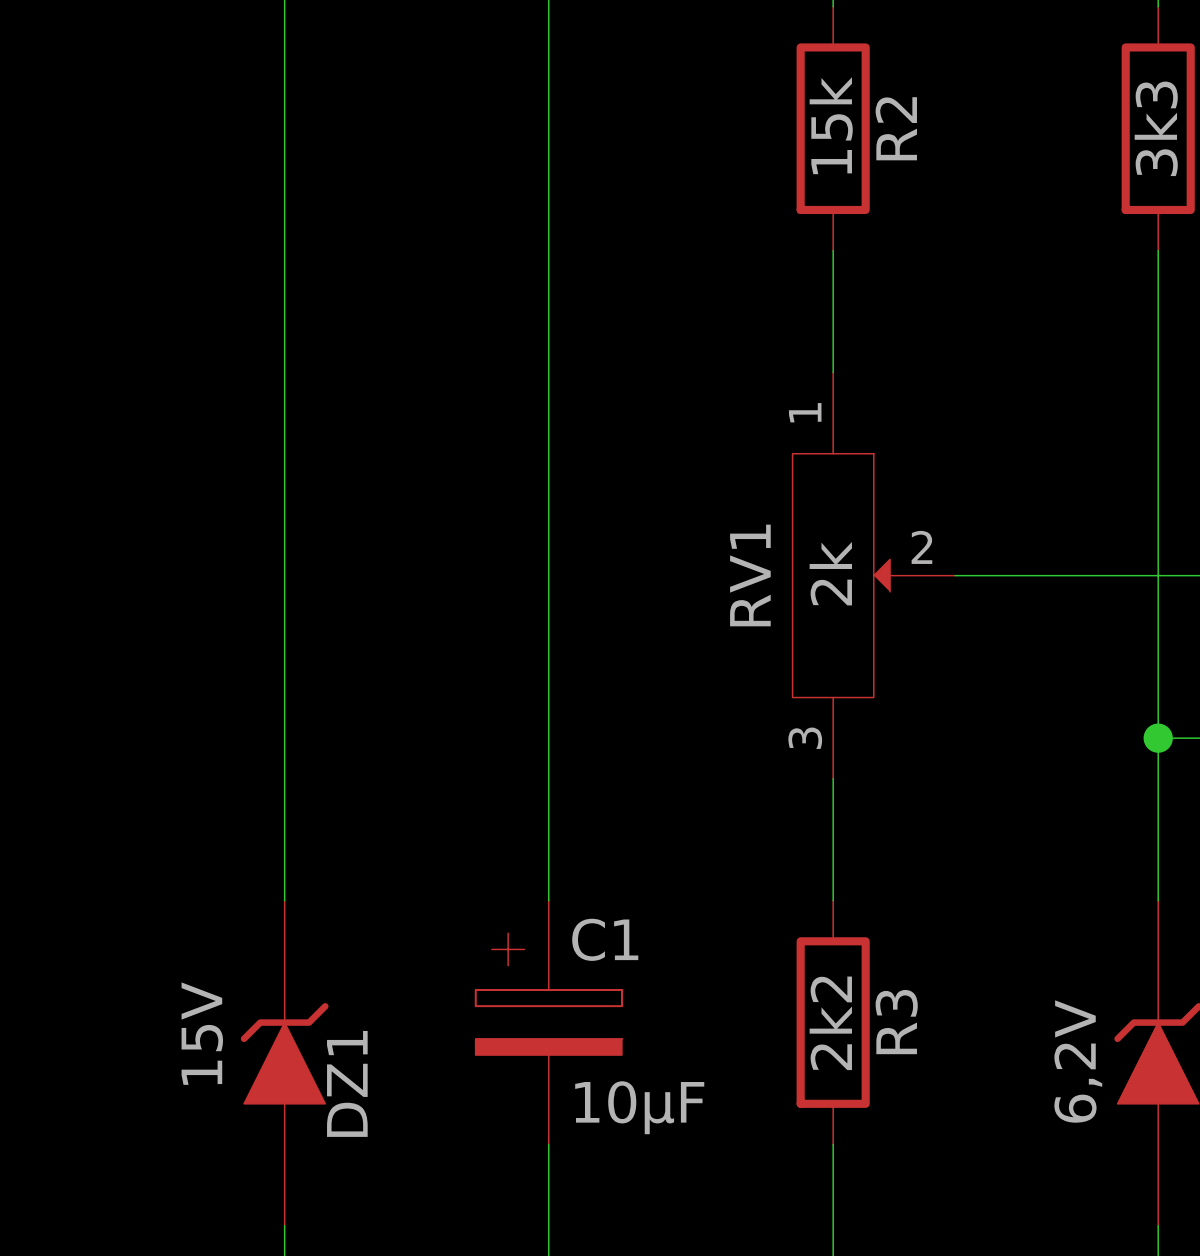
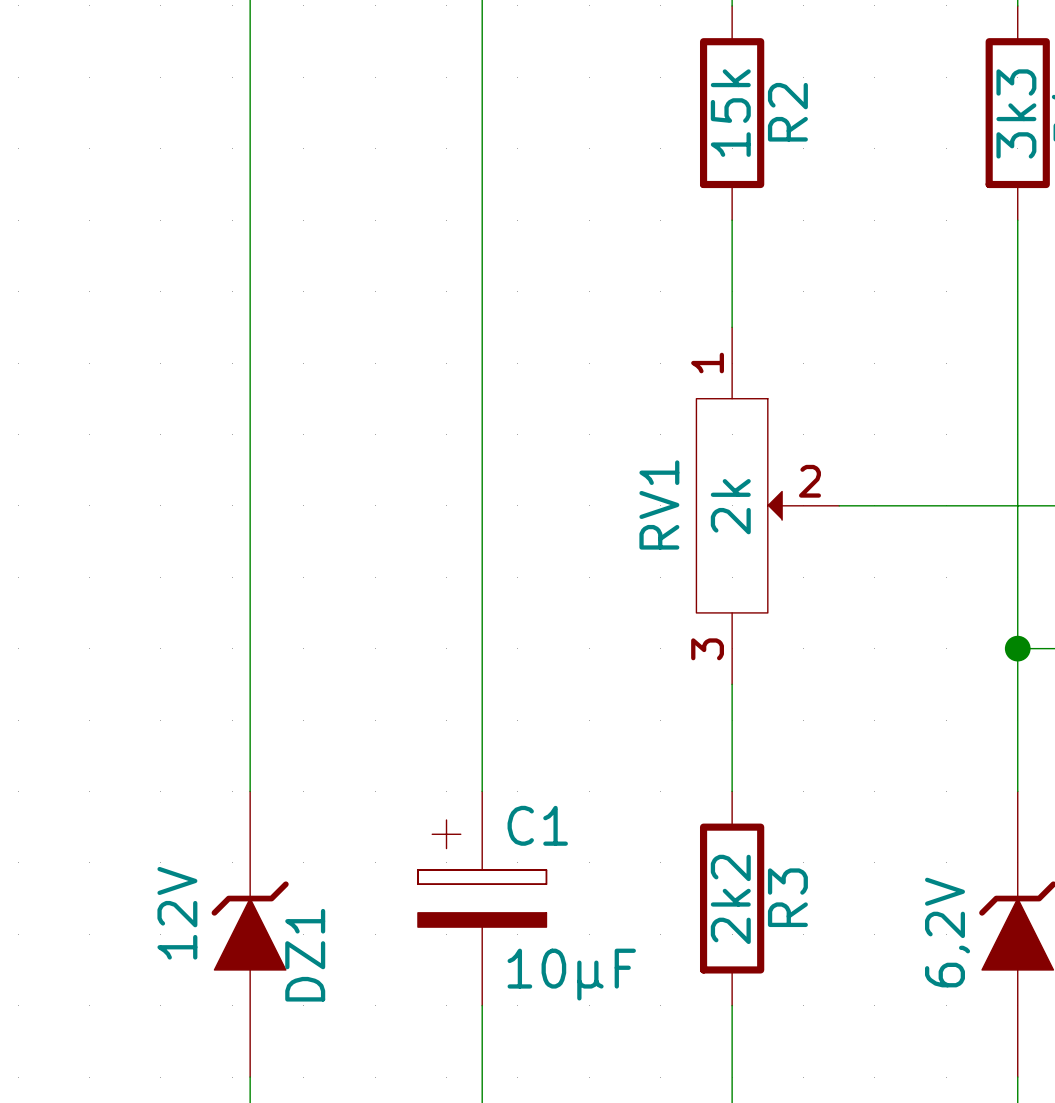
DZ1 value: 15V (202, 1033) -> 12V (177, 913)

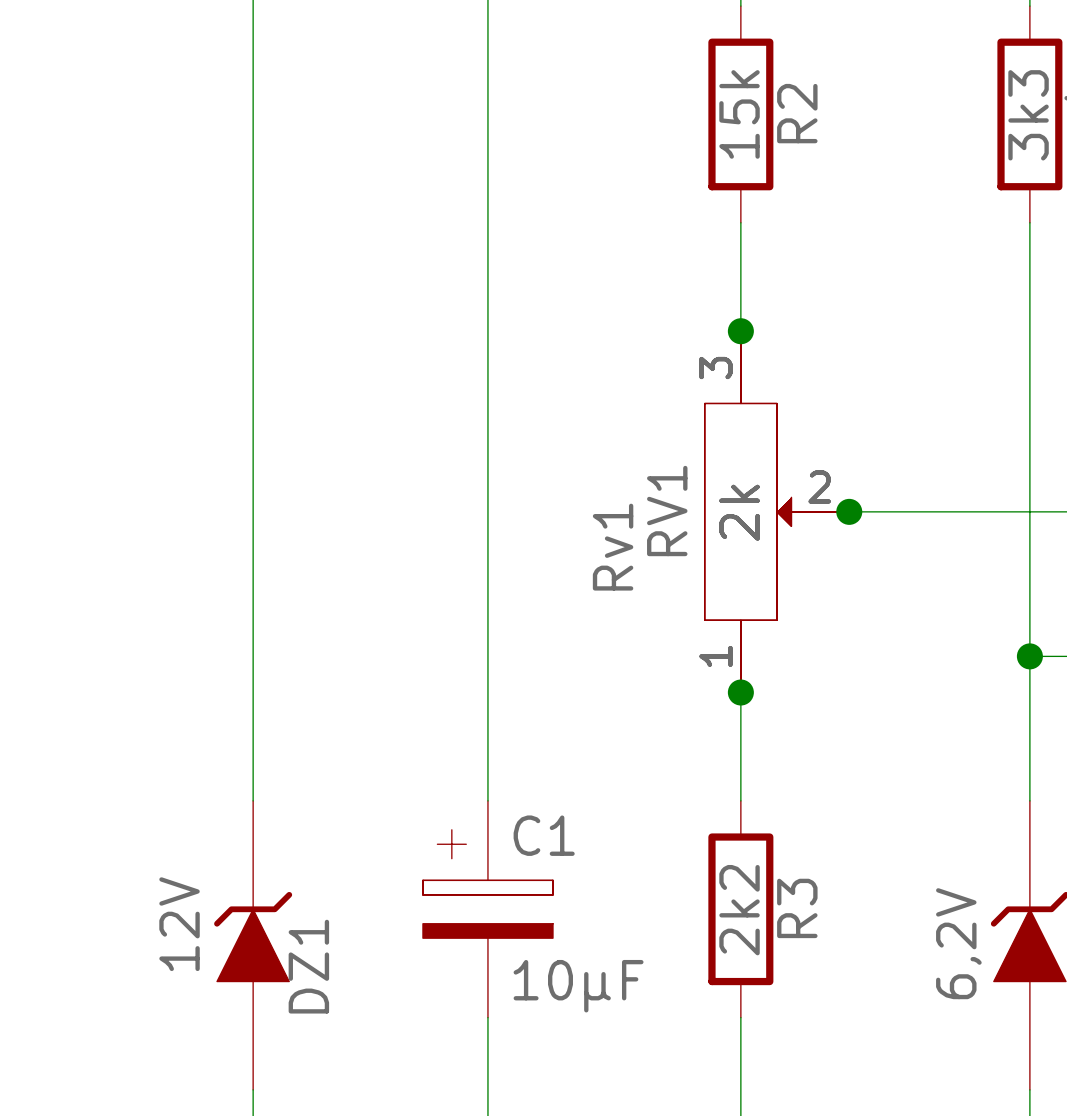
junction: none -> (740, 331)
RV1 flip: as is (739, 505) -> up-down (748, 511)
Rv1: none -> 2k (777, 511)
junction: none -> (849, 511)
junction: none -> (740, 692)

